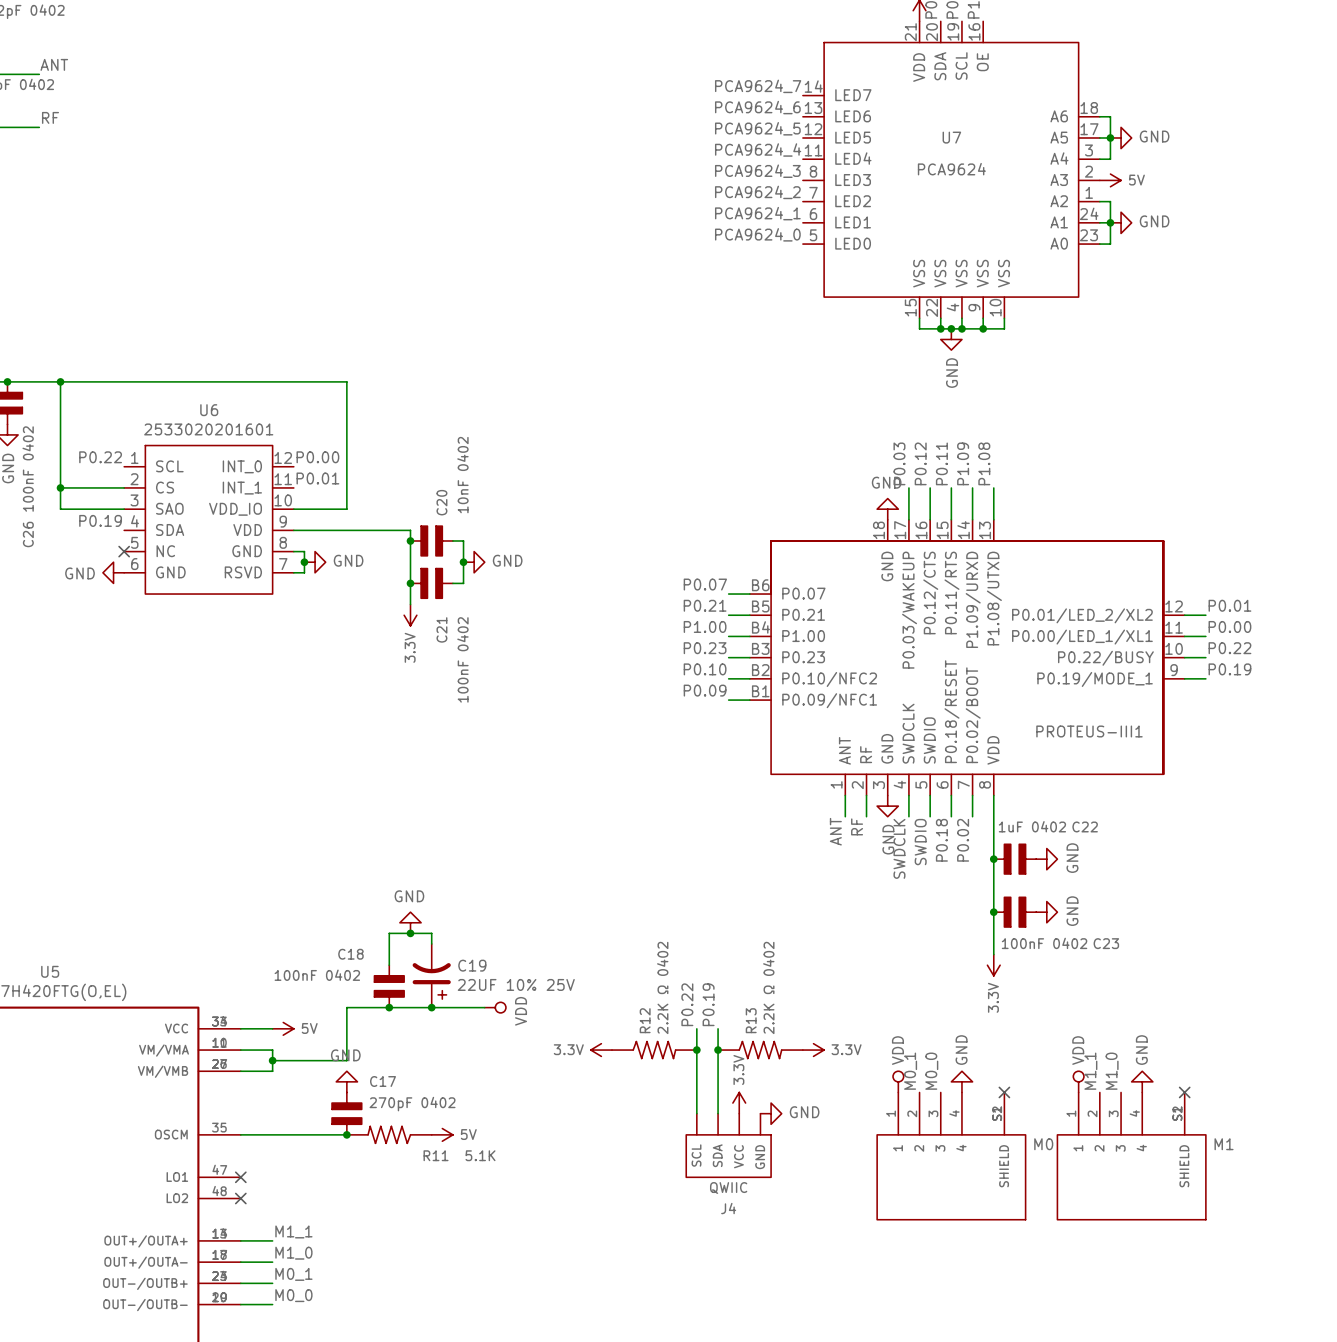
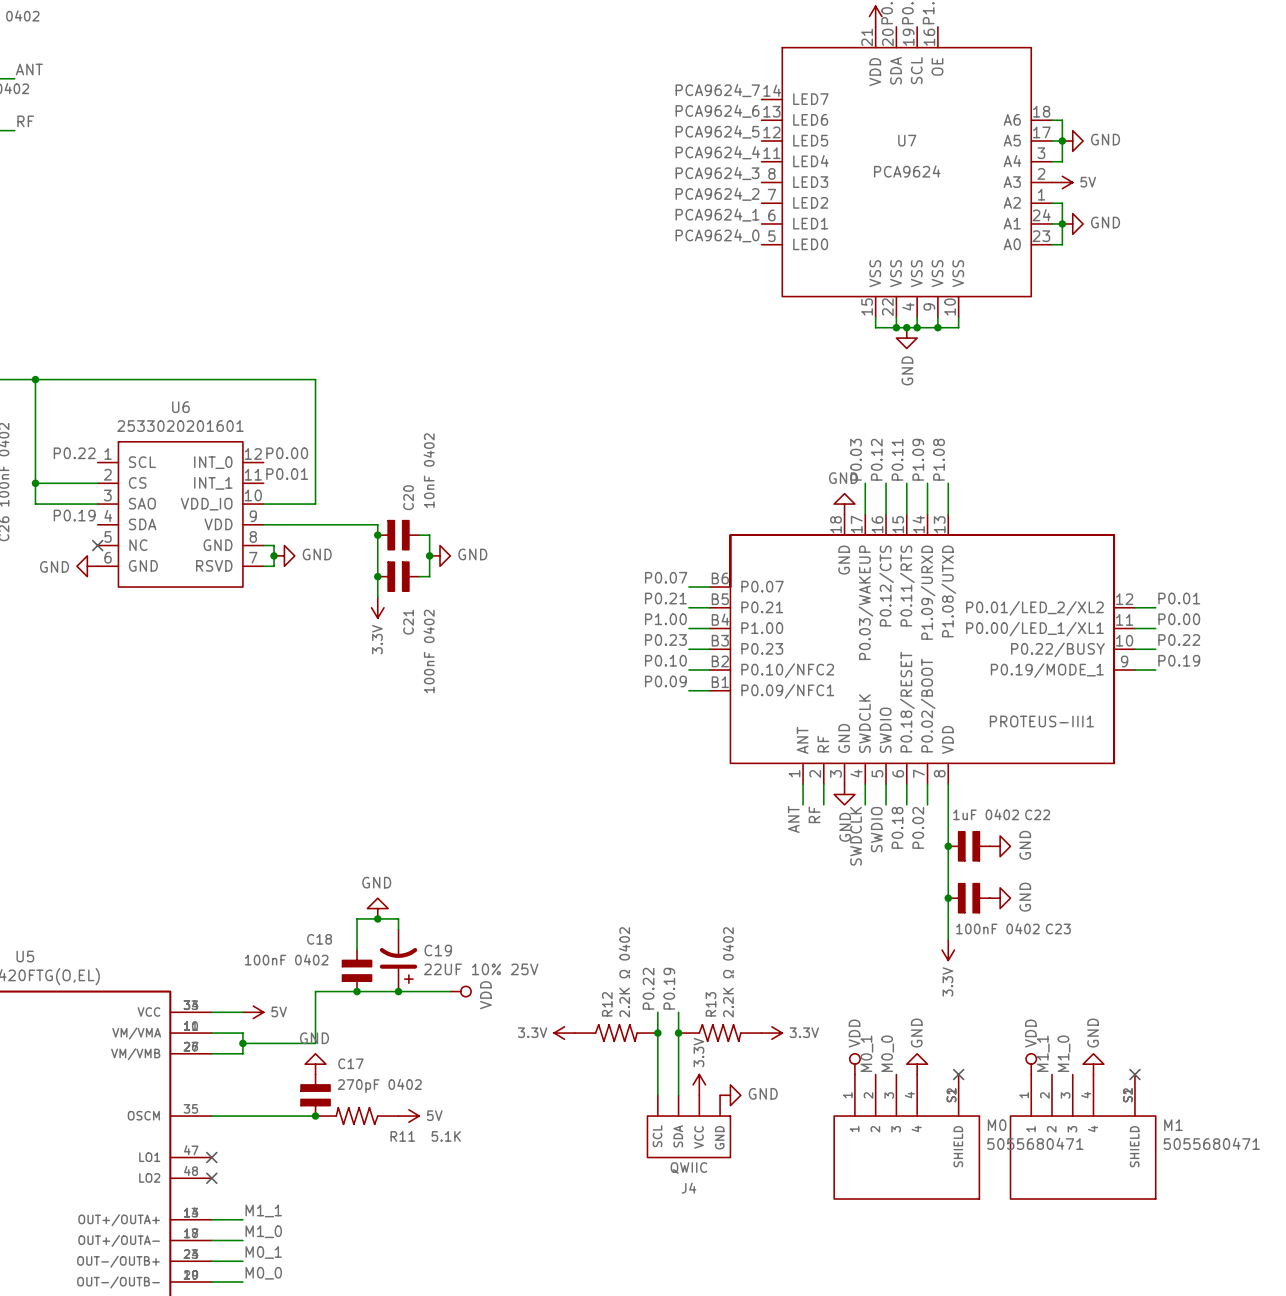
M0 value: none -> 5055680471 (1035, 1143)
M1 value: none -> 5055680471 (1211, 1143)

